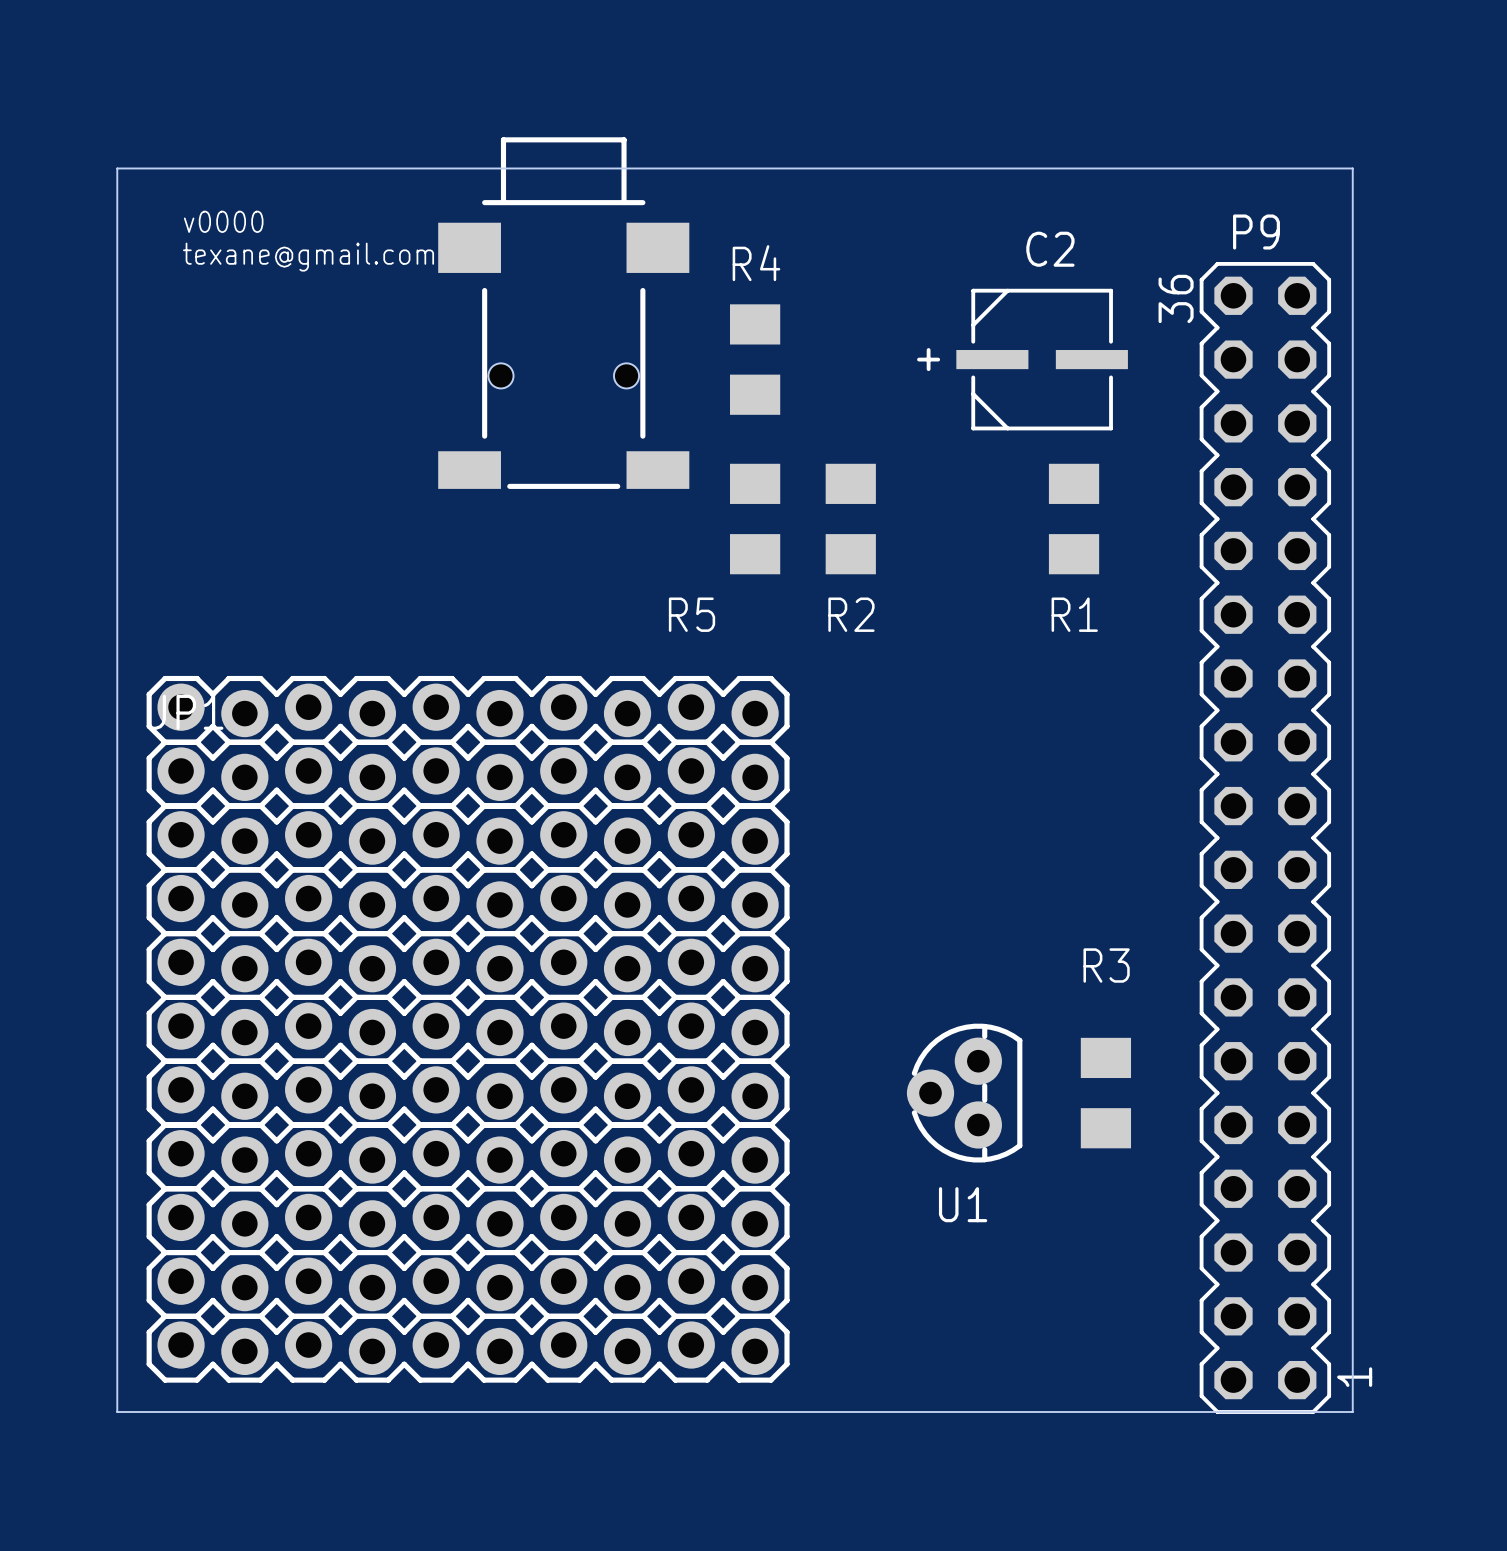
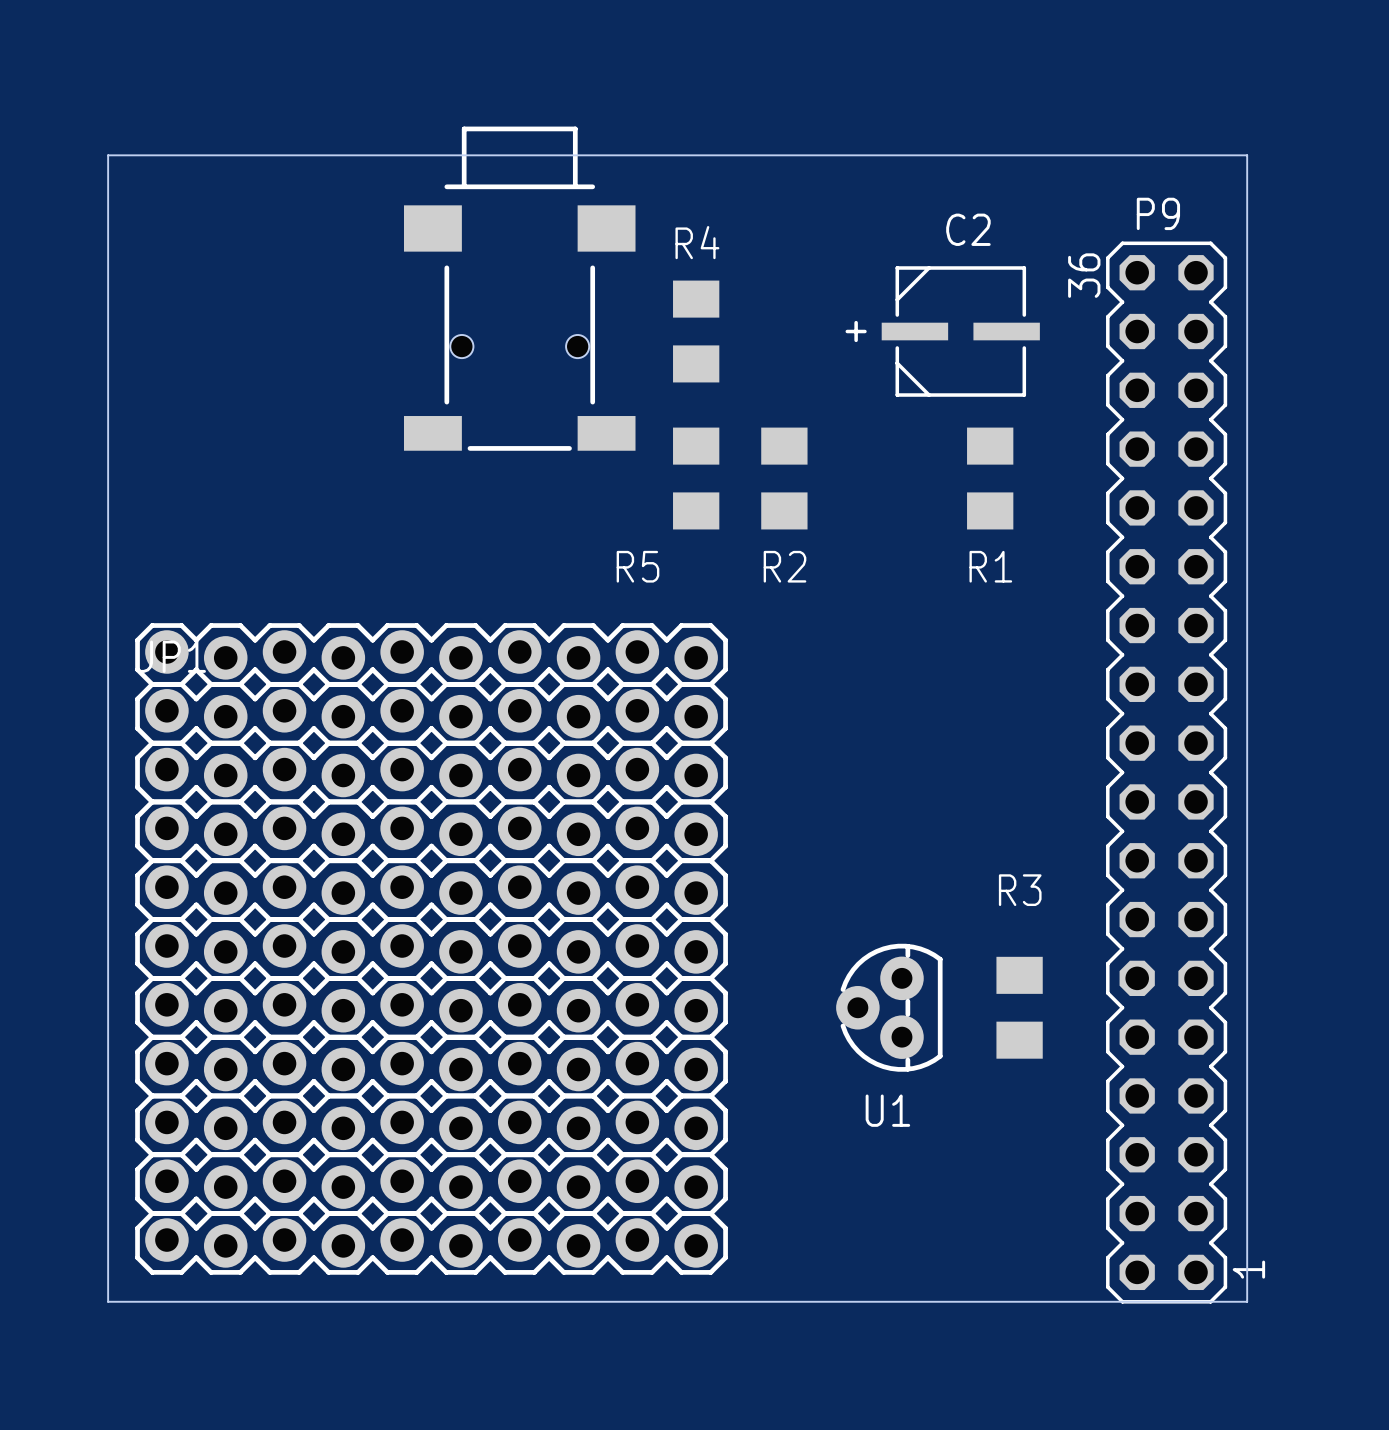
text: v0000 (223, 221) -> none
text: texane@gmail.com (308, 257) -> none

